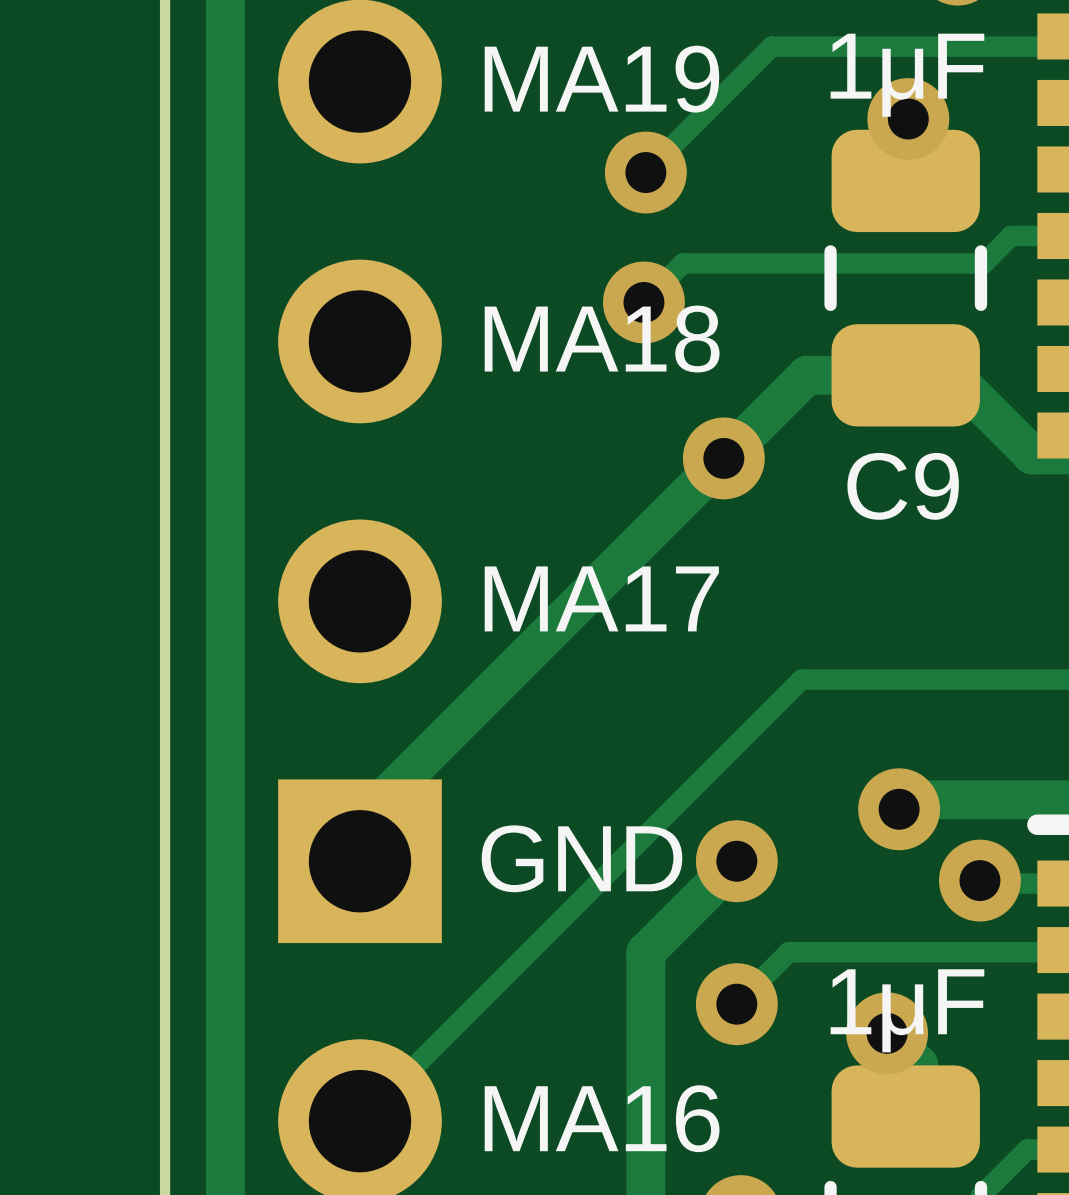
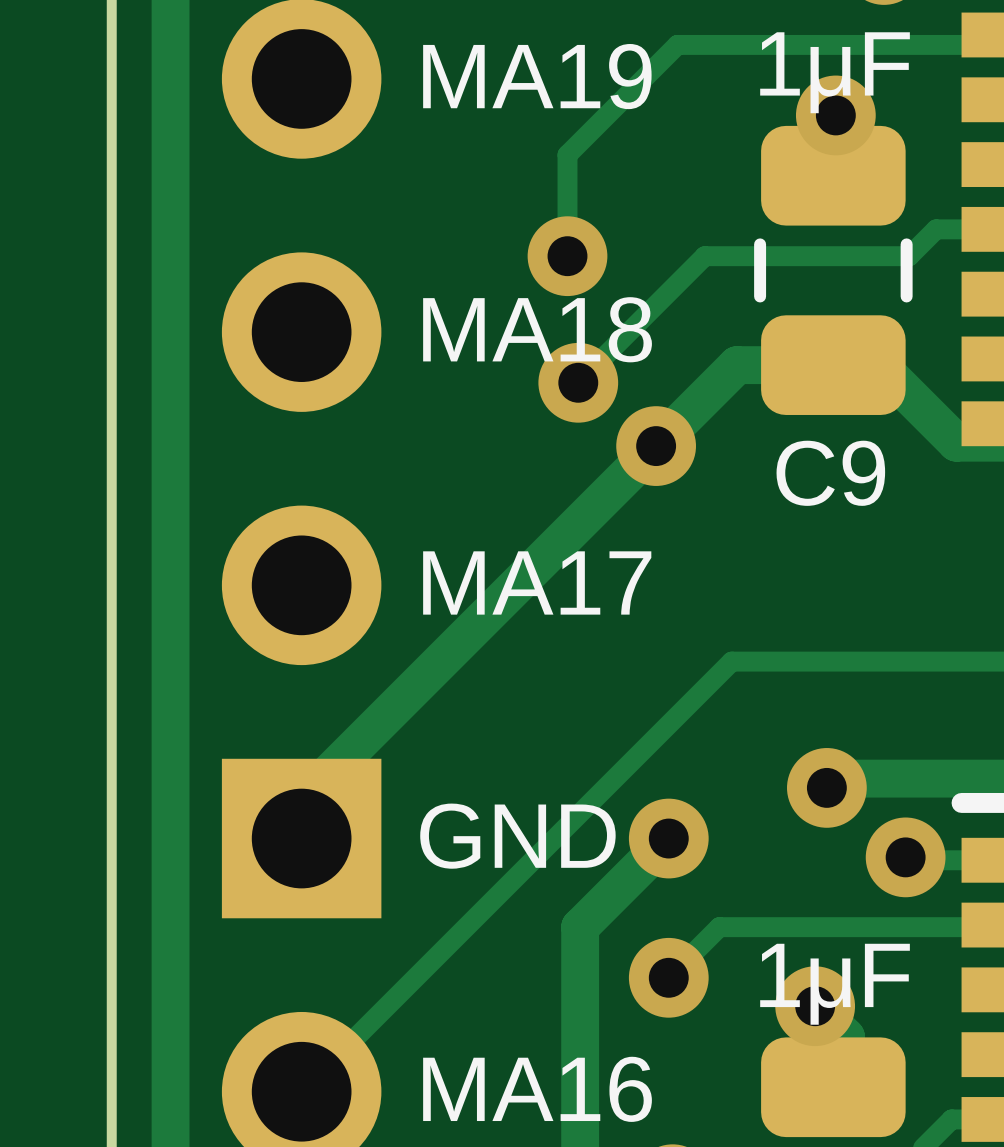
track: (771, 46) (645, 172) -> (702, 44) (677, 44) (567, 154) (567, 256)
via: (645, 172) -> none
track: (773, 263) (682, 263) (643, 302) -> (704, 256) (578, 382)
via position: (643, 302) -> (567, 256)
via: none -> (578, 382)

